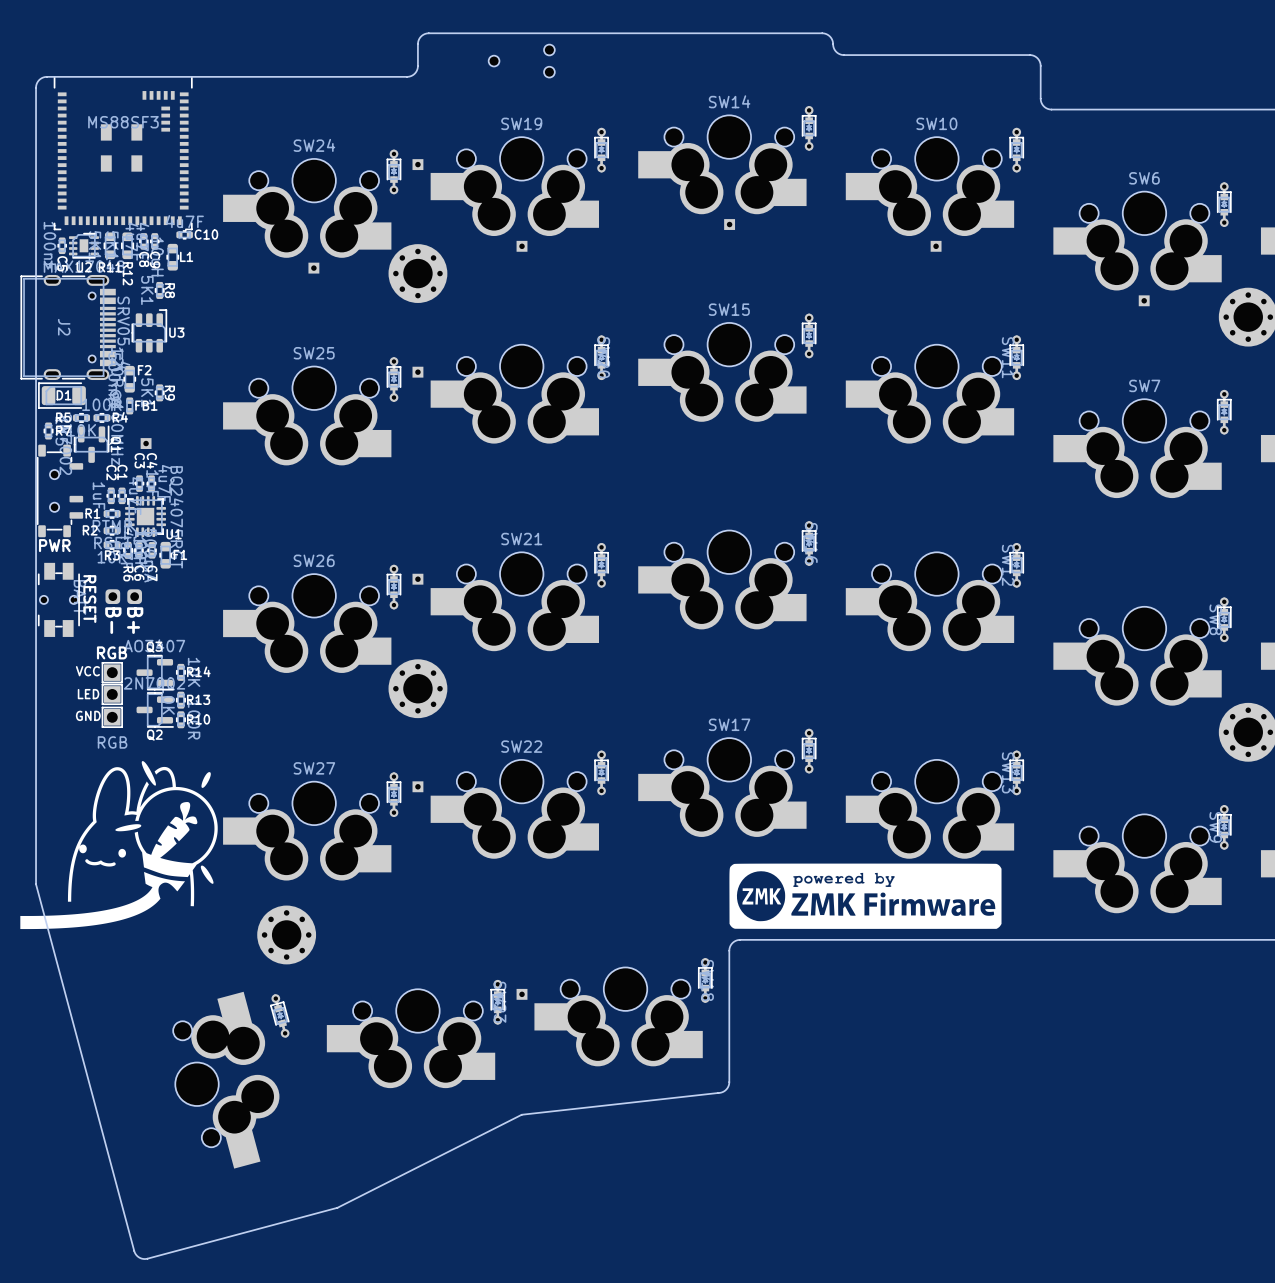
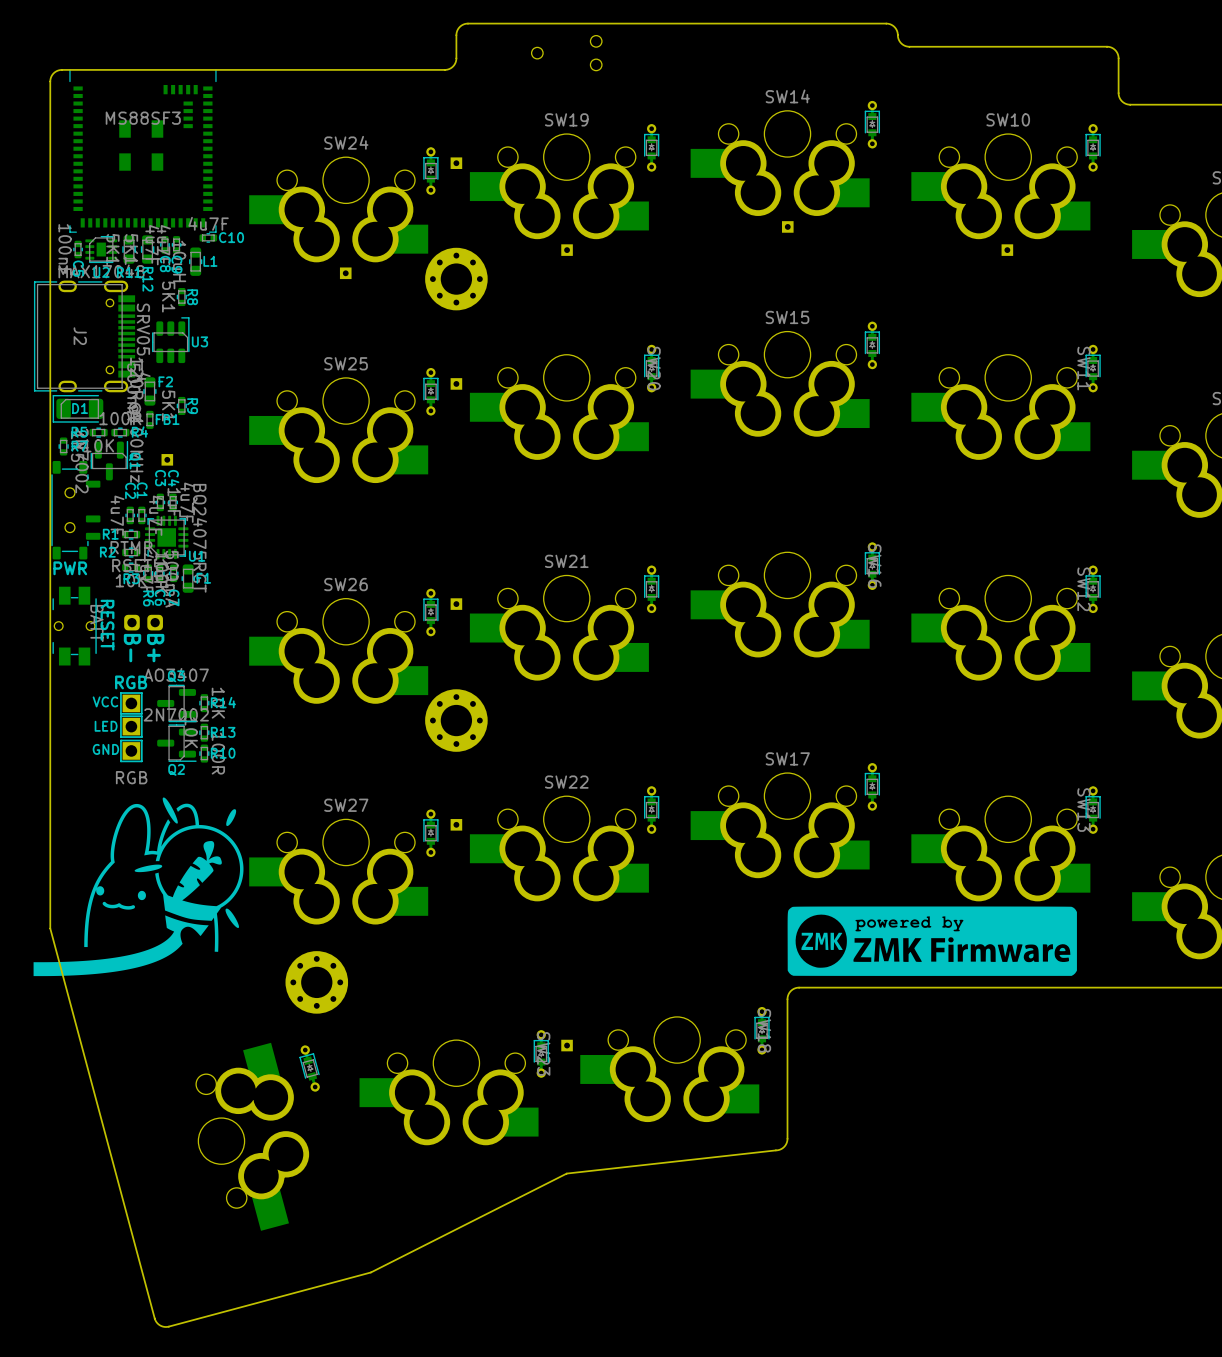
C2 value: 1uF (98, 496) -> 4u7F (117, 515)

